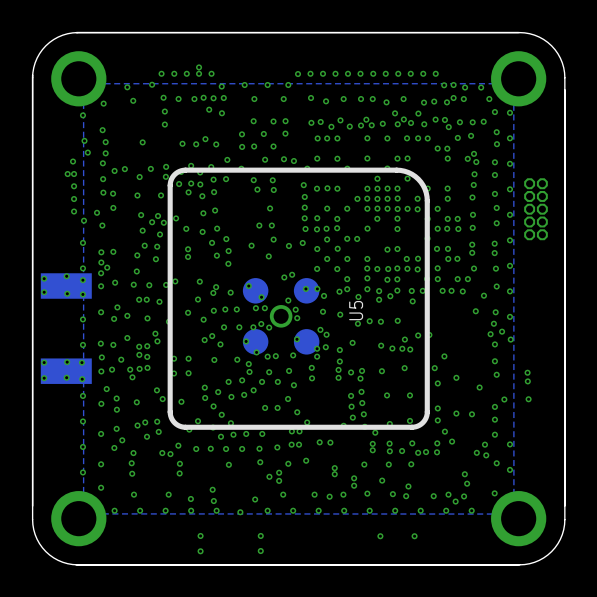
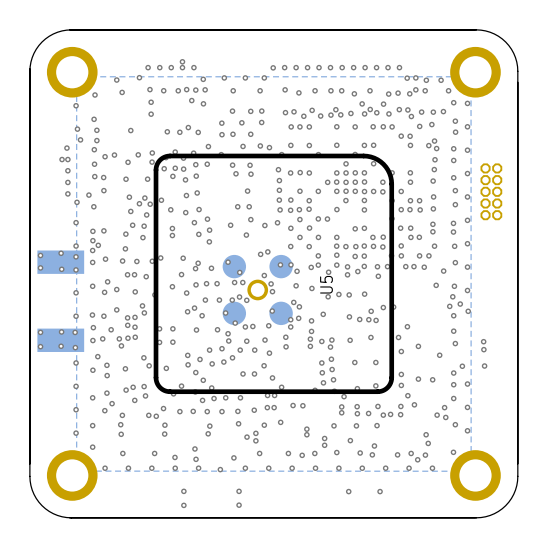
via: none -> (467, 384)
via: none -> (208, 433)

